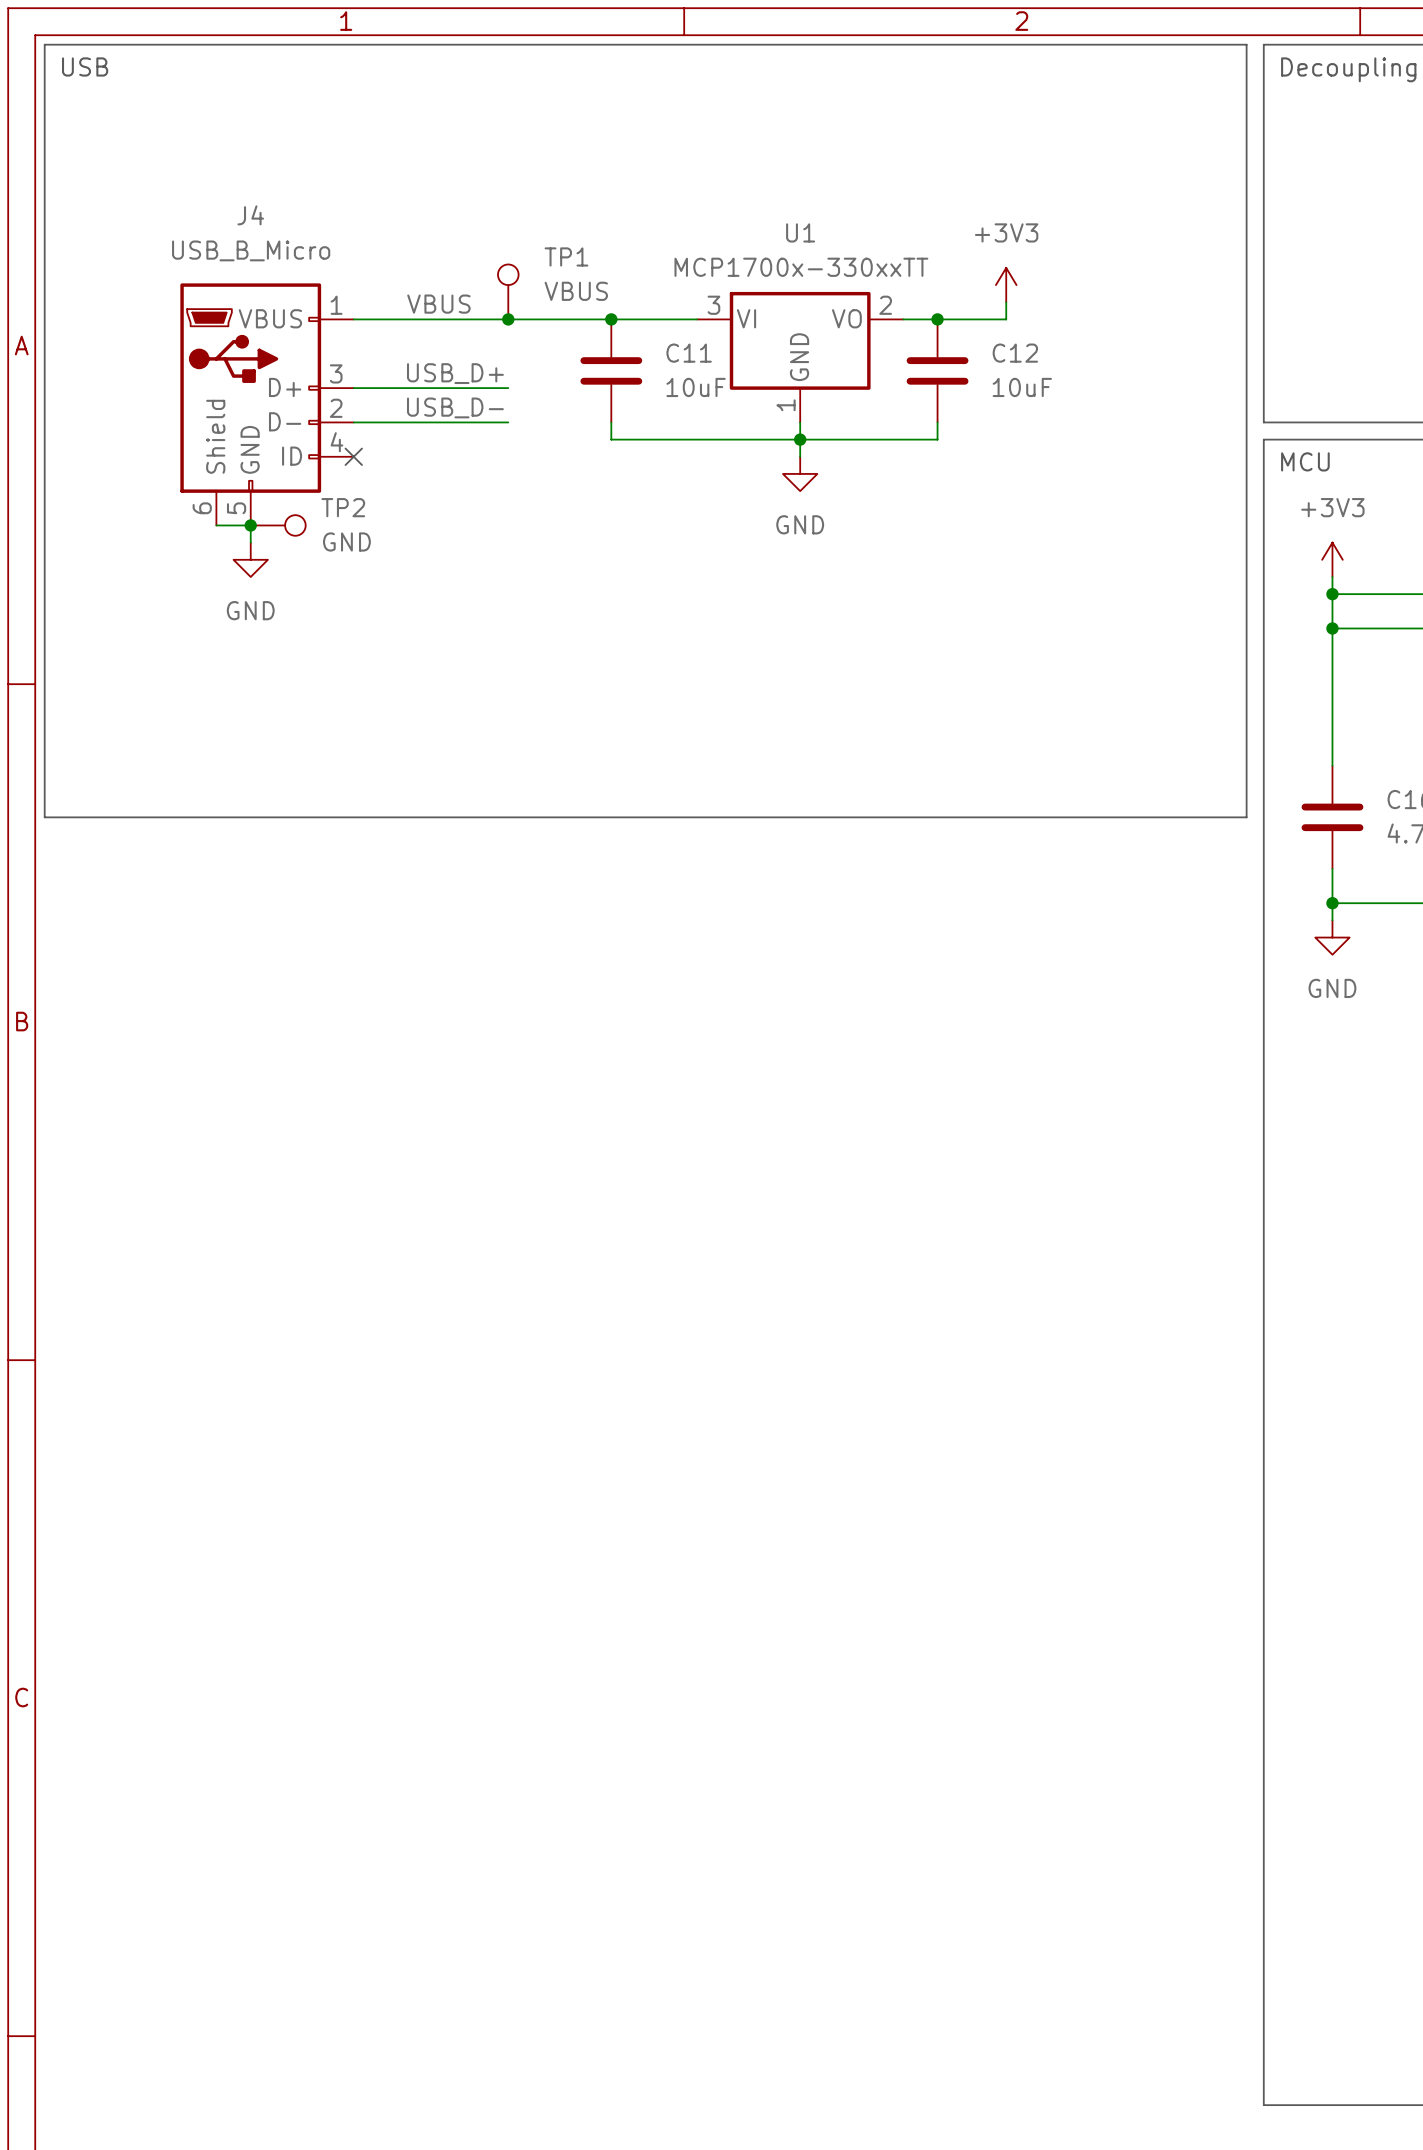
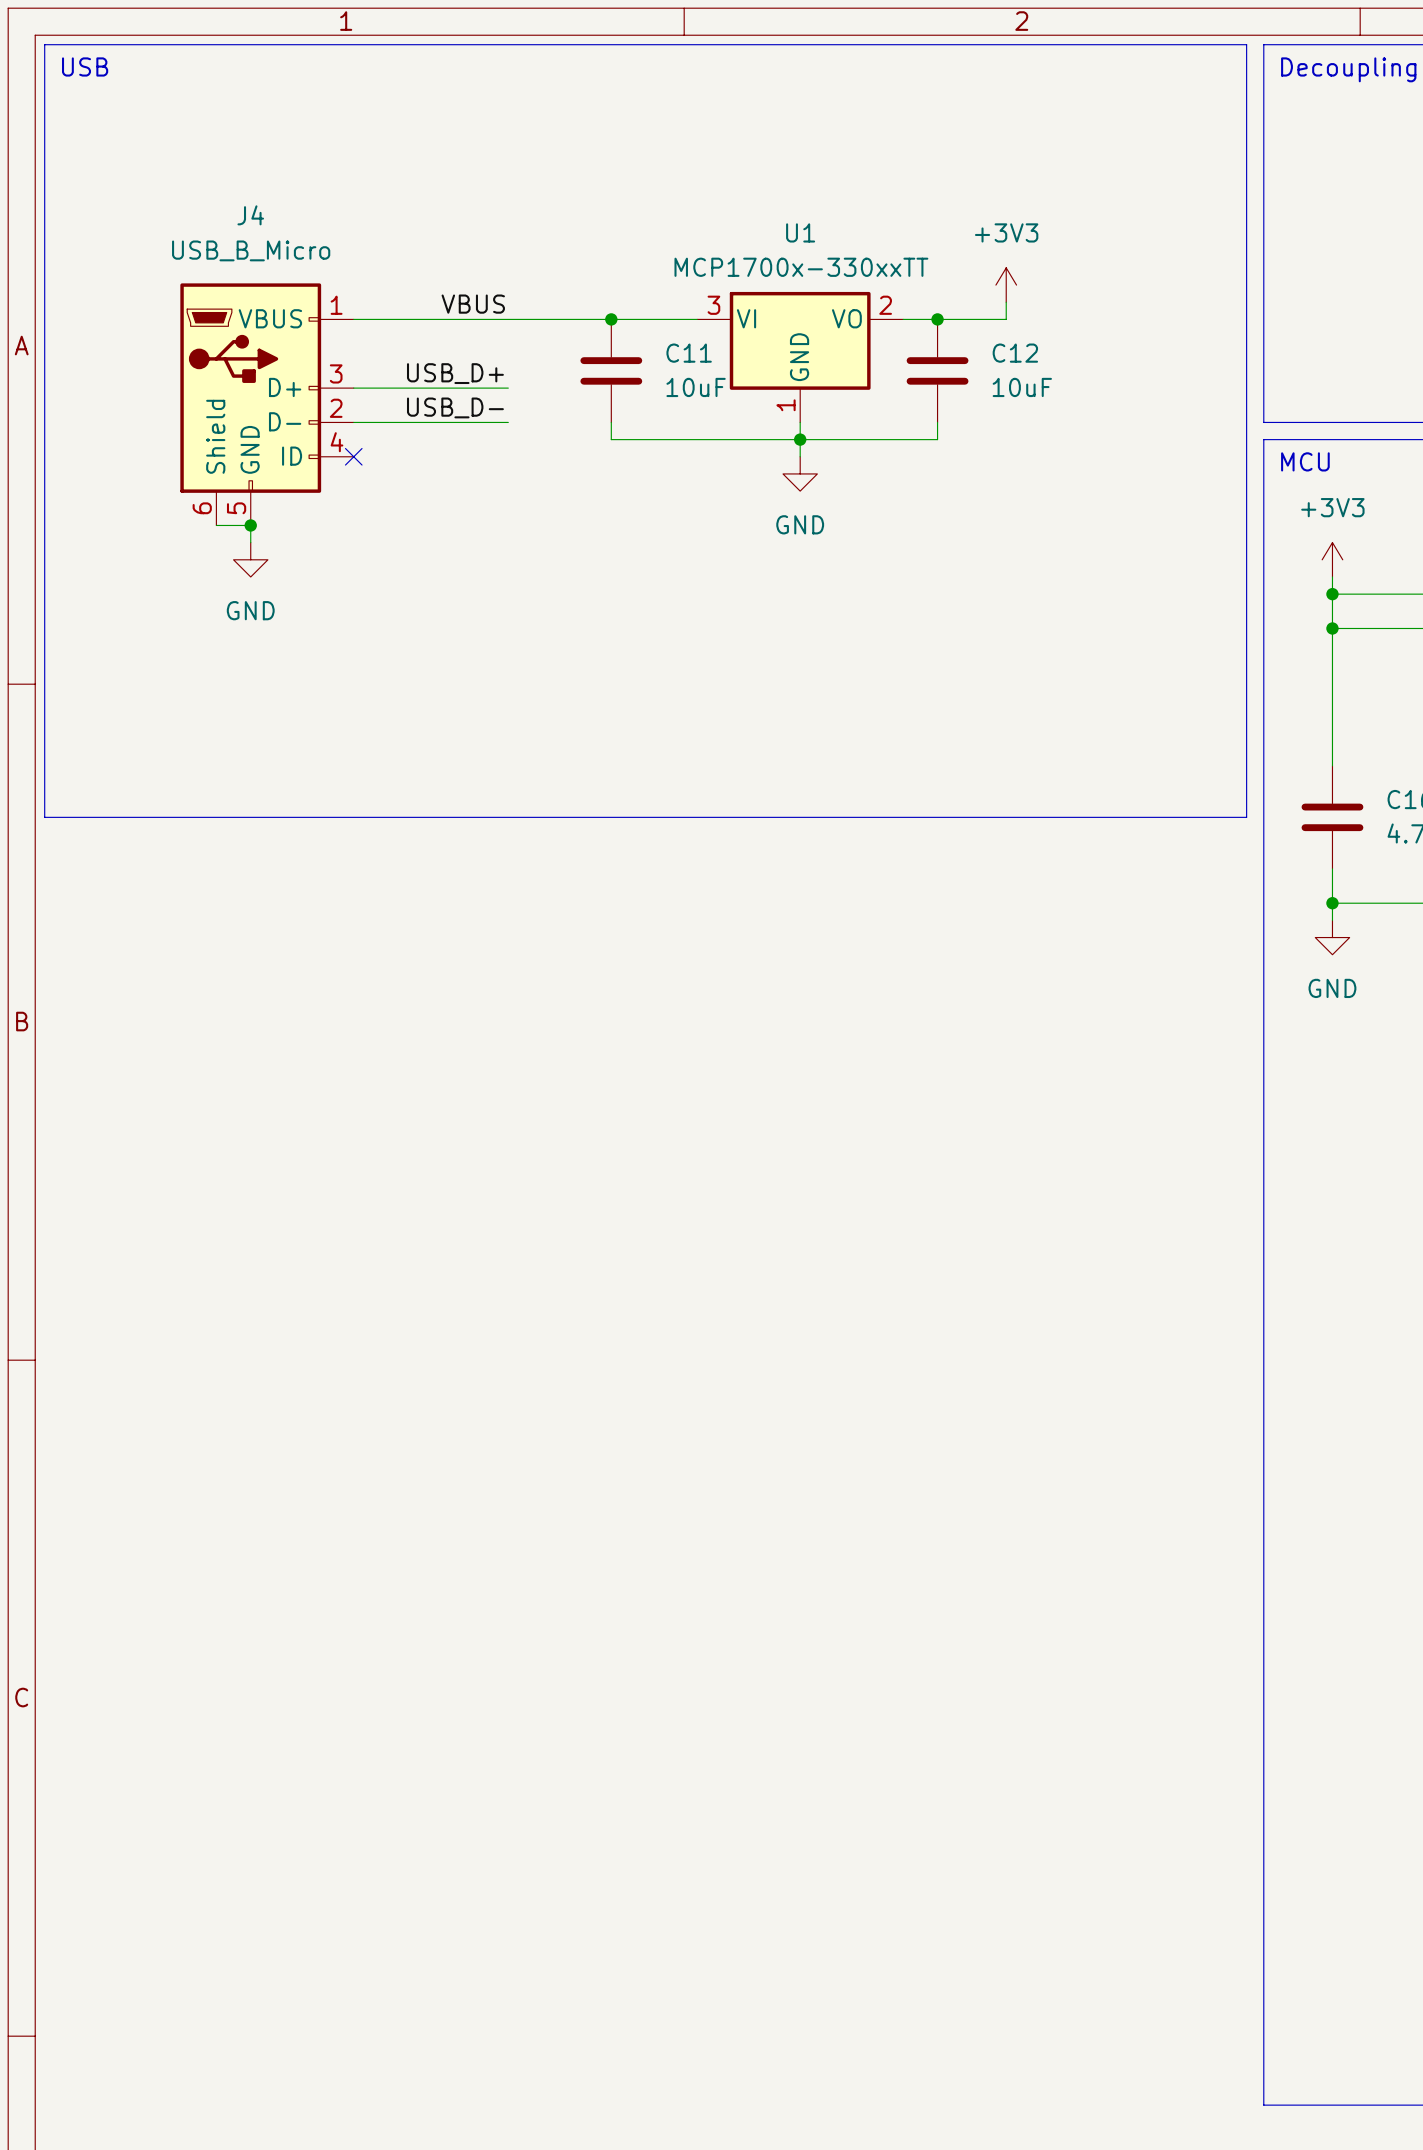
TP1: VBUS (508, 291) -> none
label position: VBUS (438, 304) -> VBUS (473, 304)
junction: (508, 319) -> none
TP2: GND (278, 525) -> none

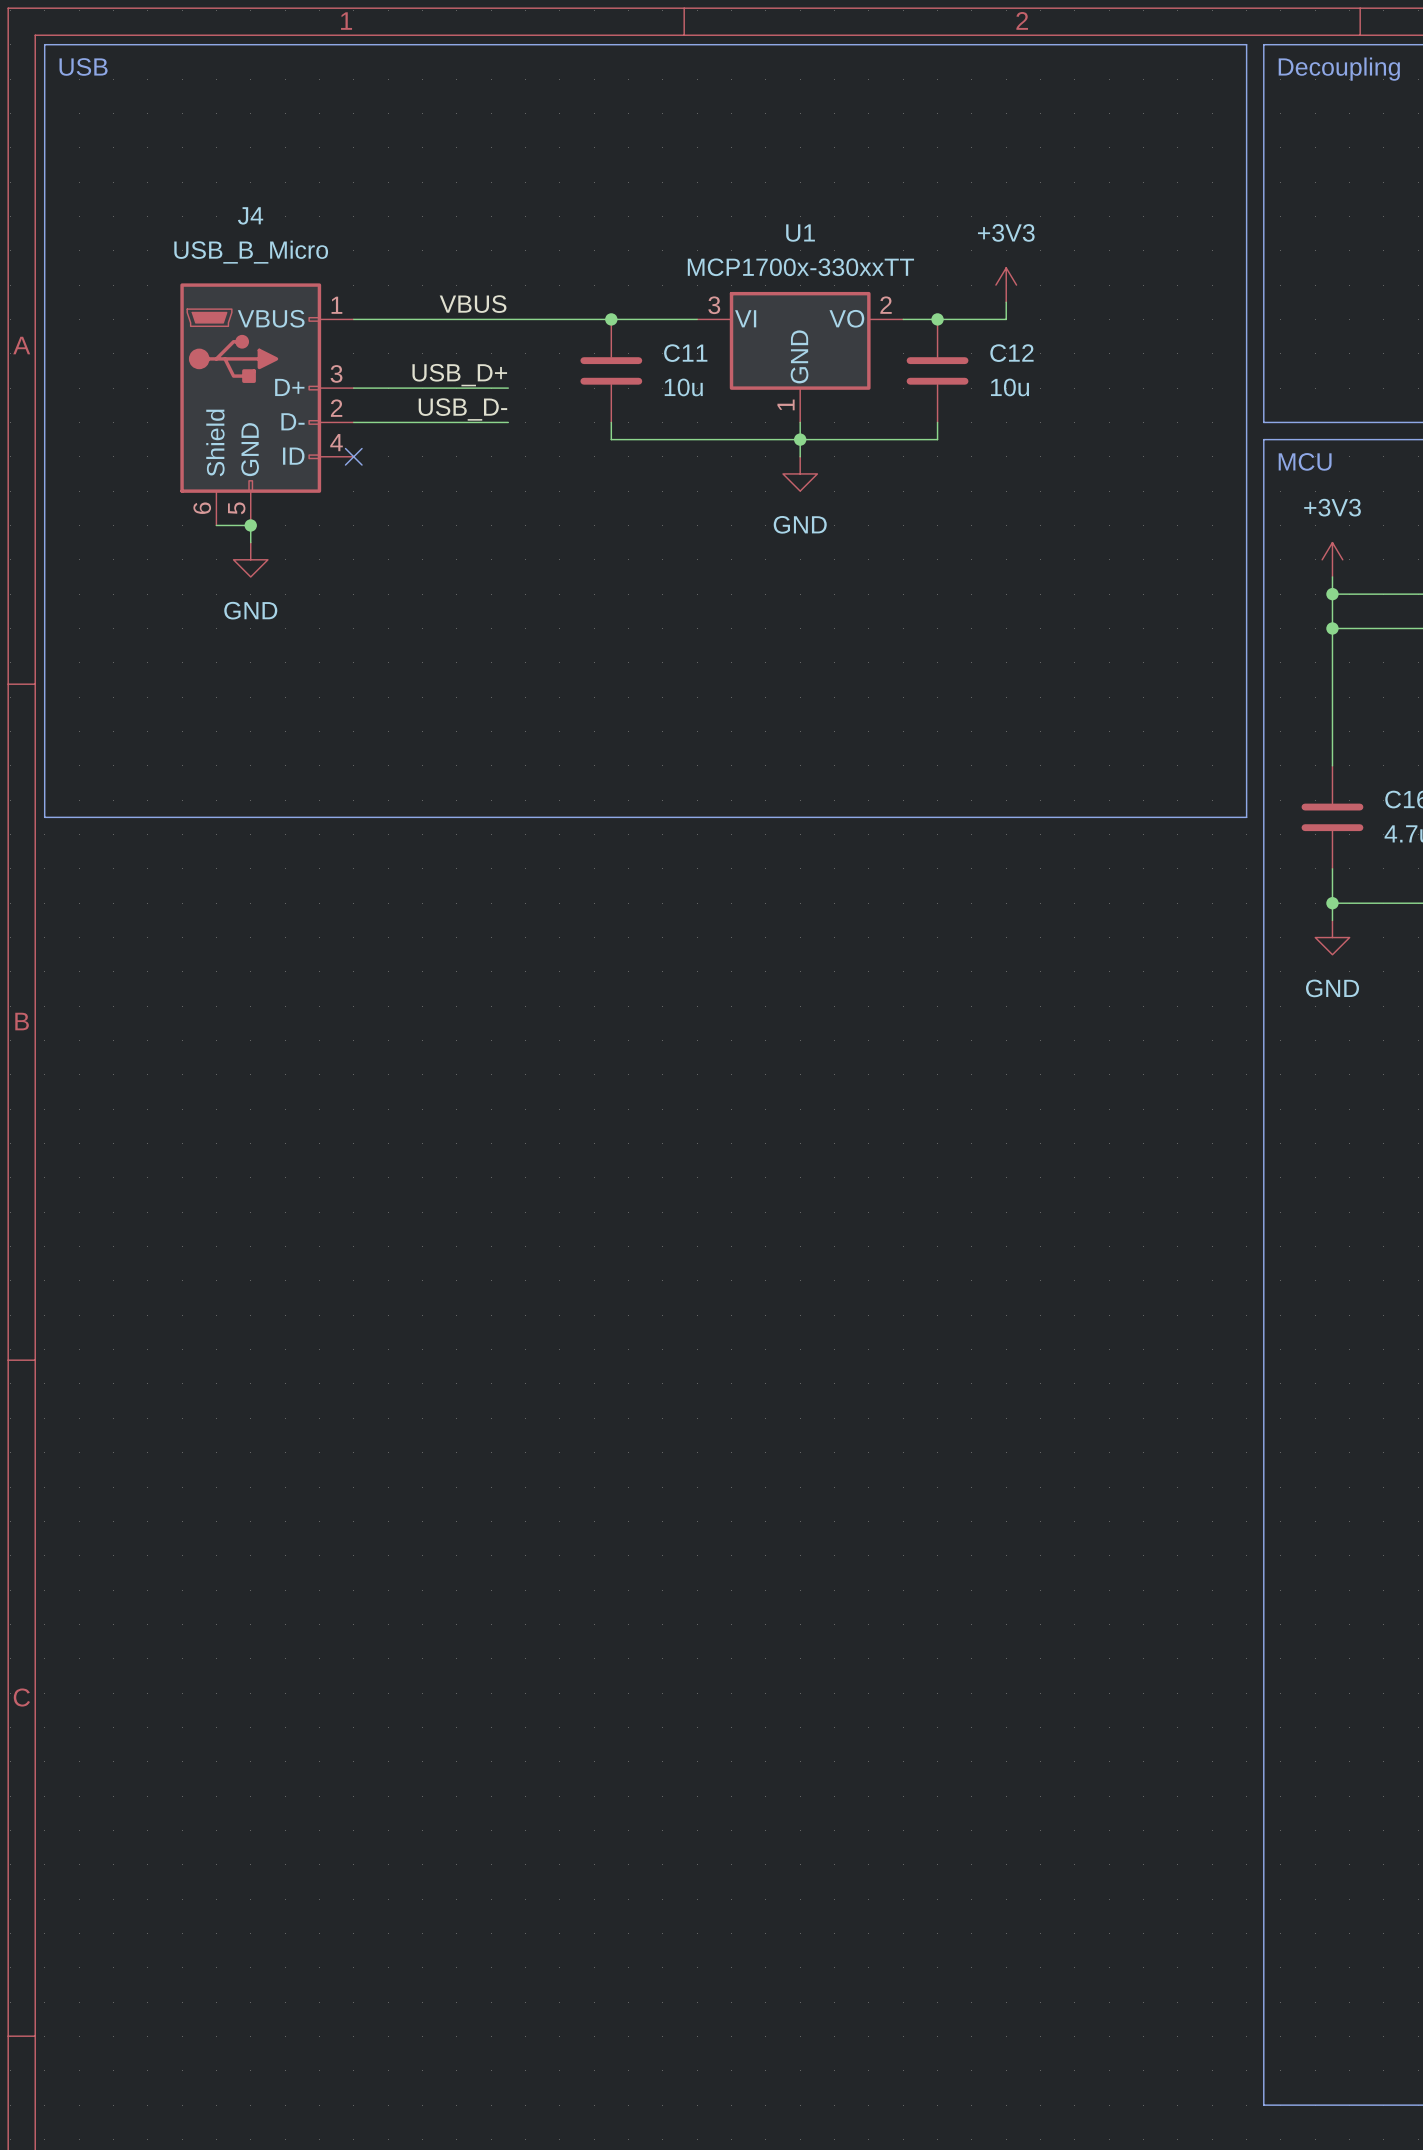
C11 value: 10uF (696, 387) -> 10u (683, 387)
C12 value: 10uF (1022, 387) -> 10u (1010, 387)

